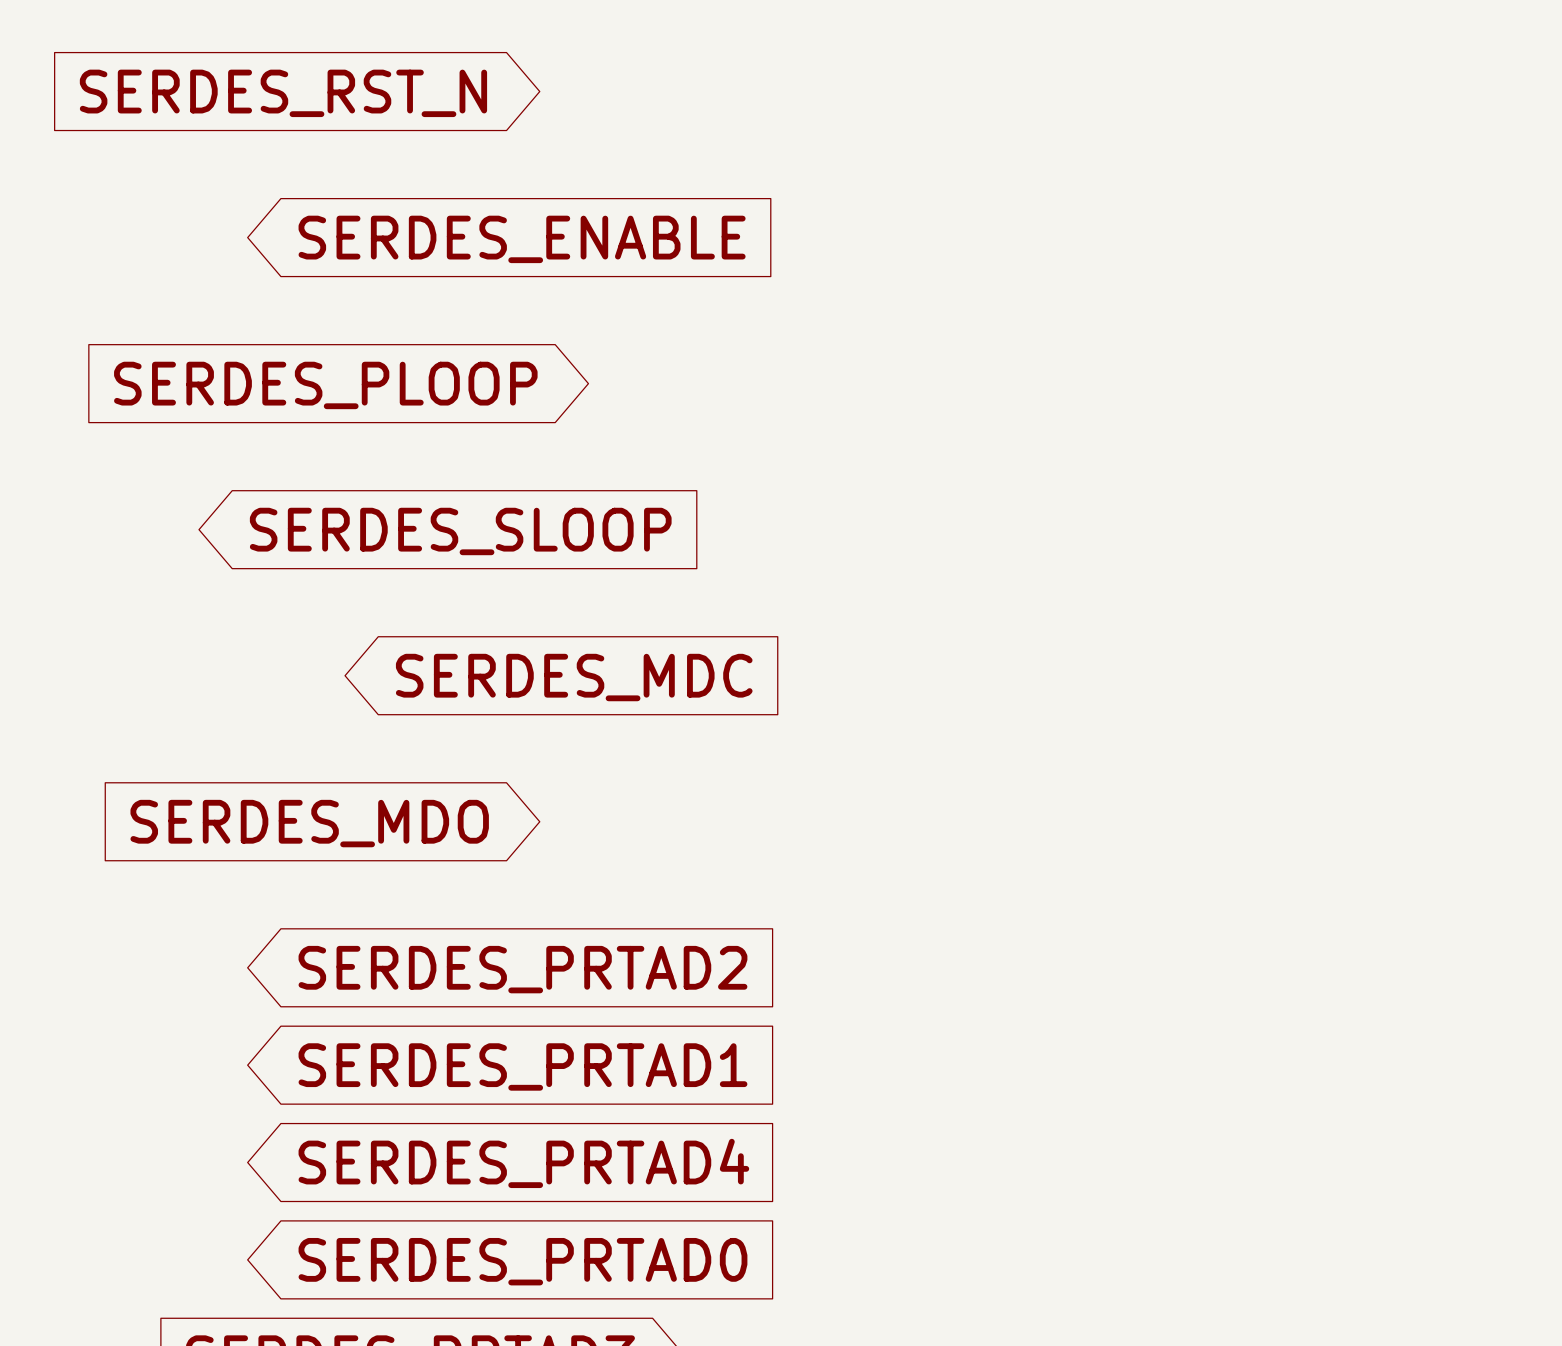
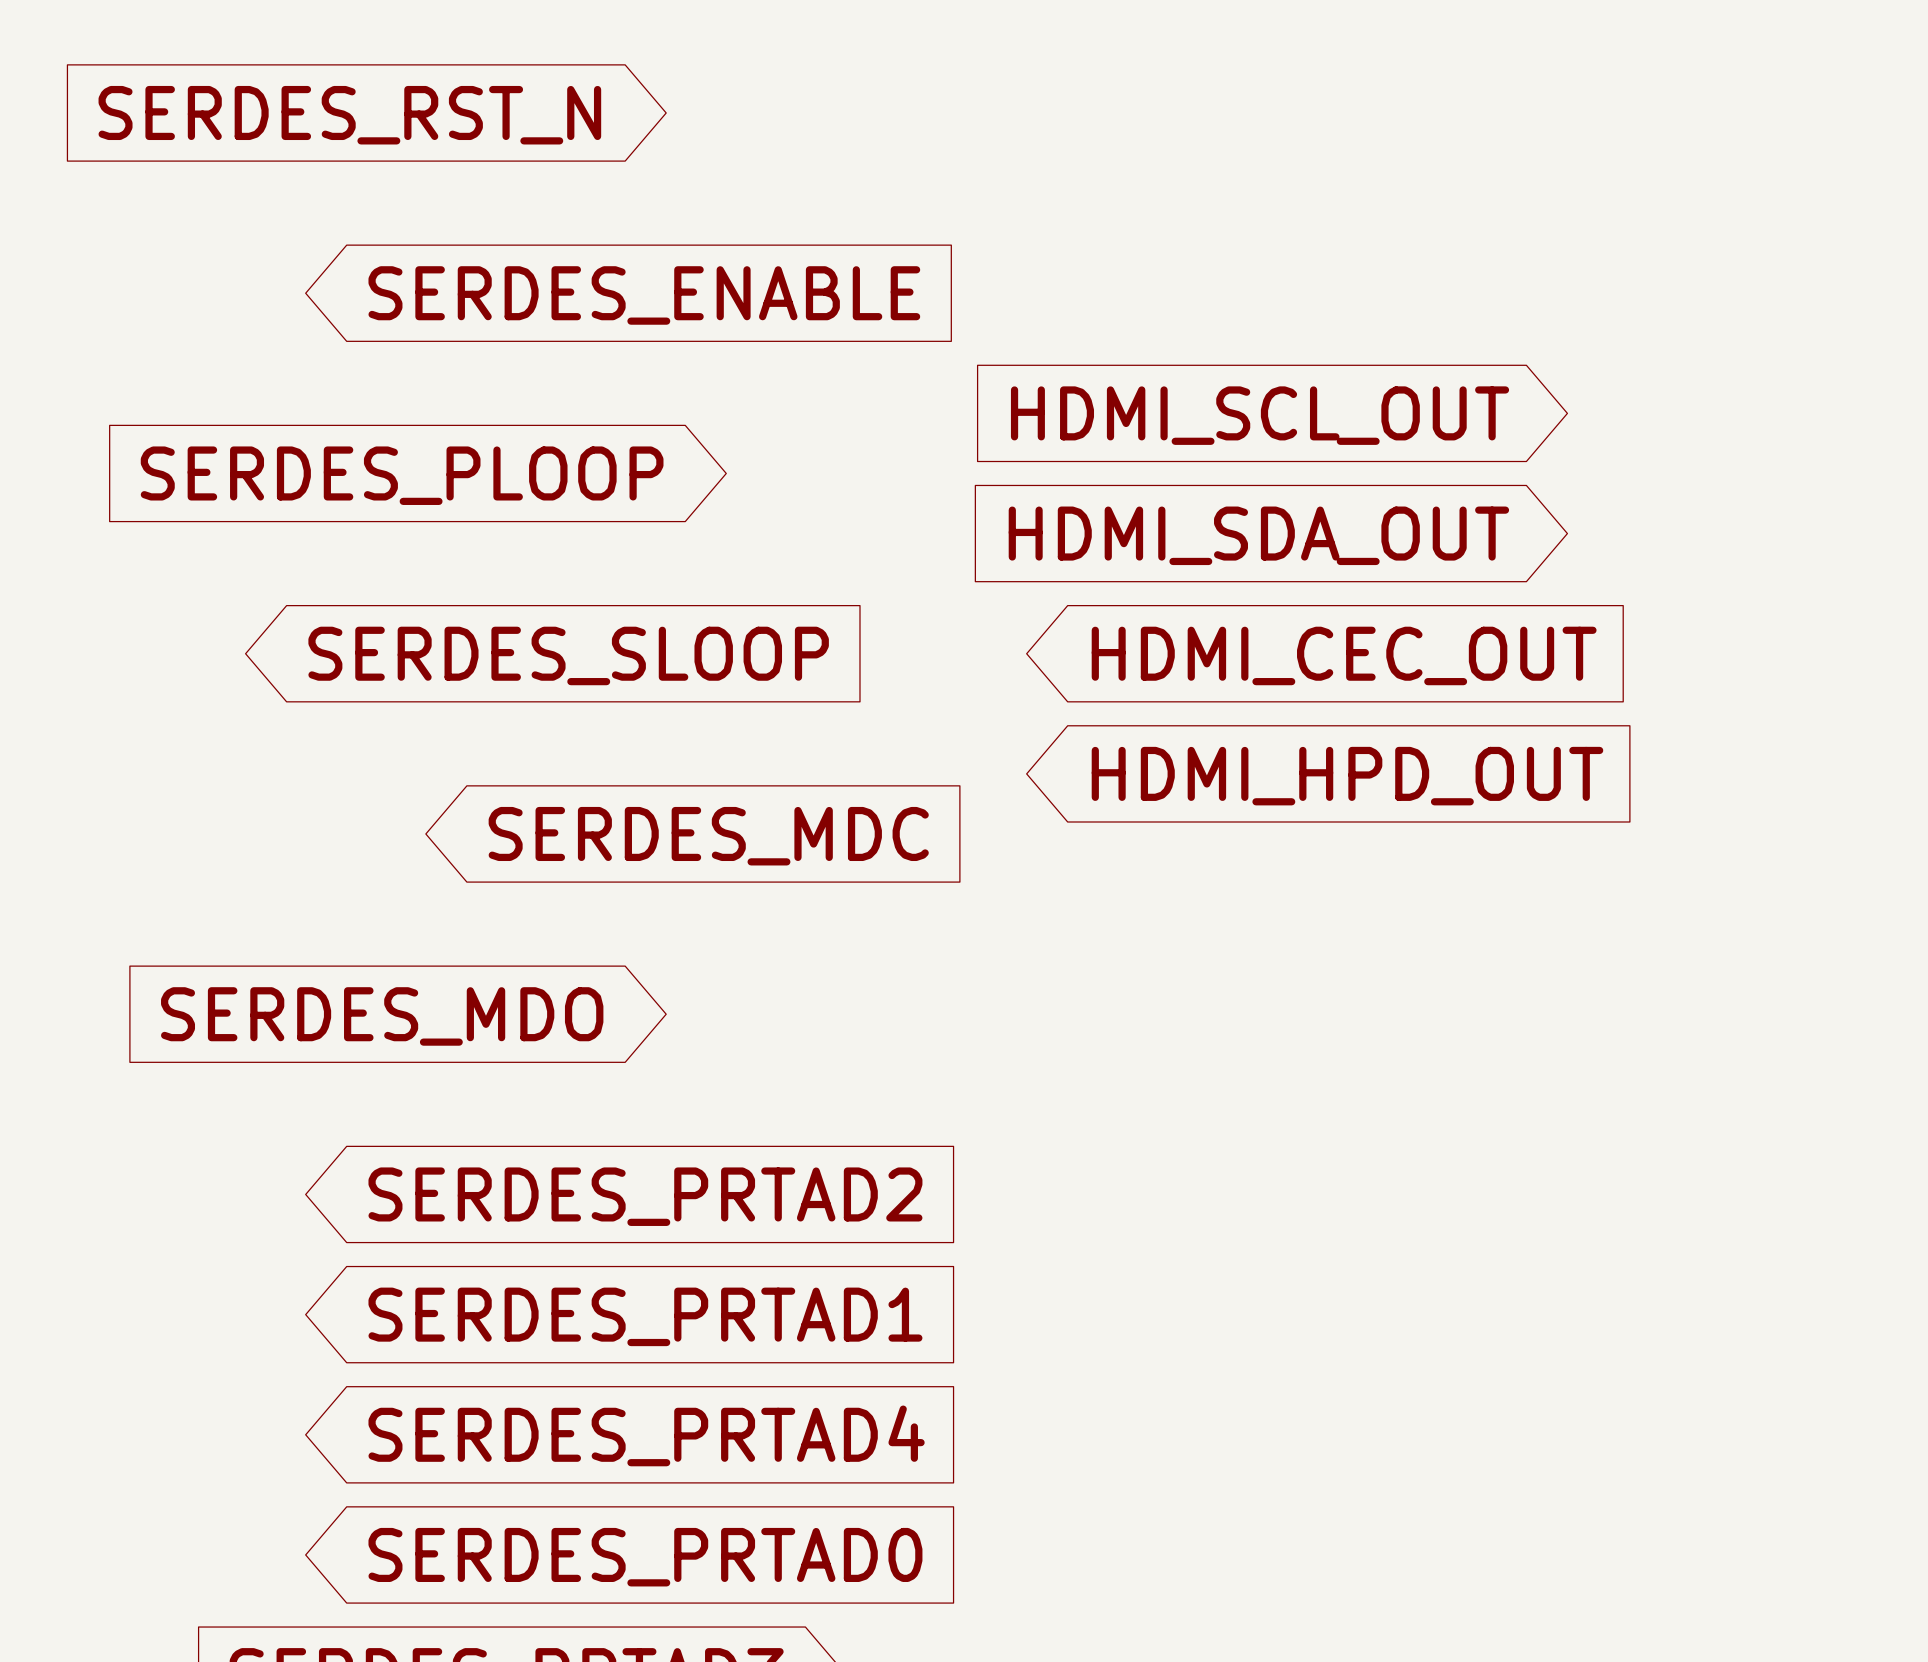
global label: none -> HDMI_SCL_OUT (1260, 415)
global label: none -> HDMI_SDA_OUT (1258, 535)
global label: none -> HDMI_CEC_OUT (1344, 655)
global label: none -> HDMI_HPD_OUT (1347, 776)

